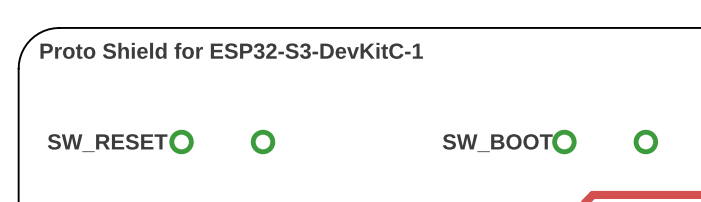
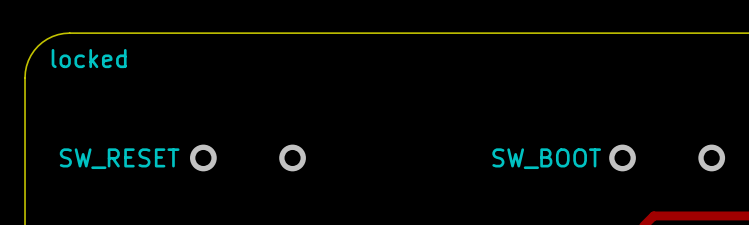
text: Proto Shield for ESP32-S3-DevKitC-1 (231, 50) -> locked (89, 58)

